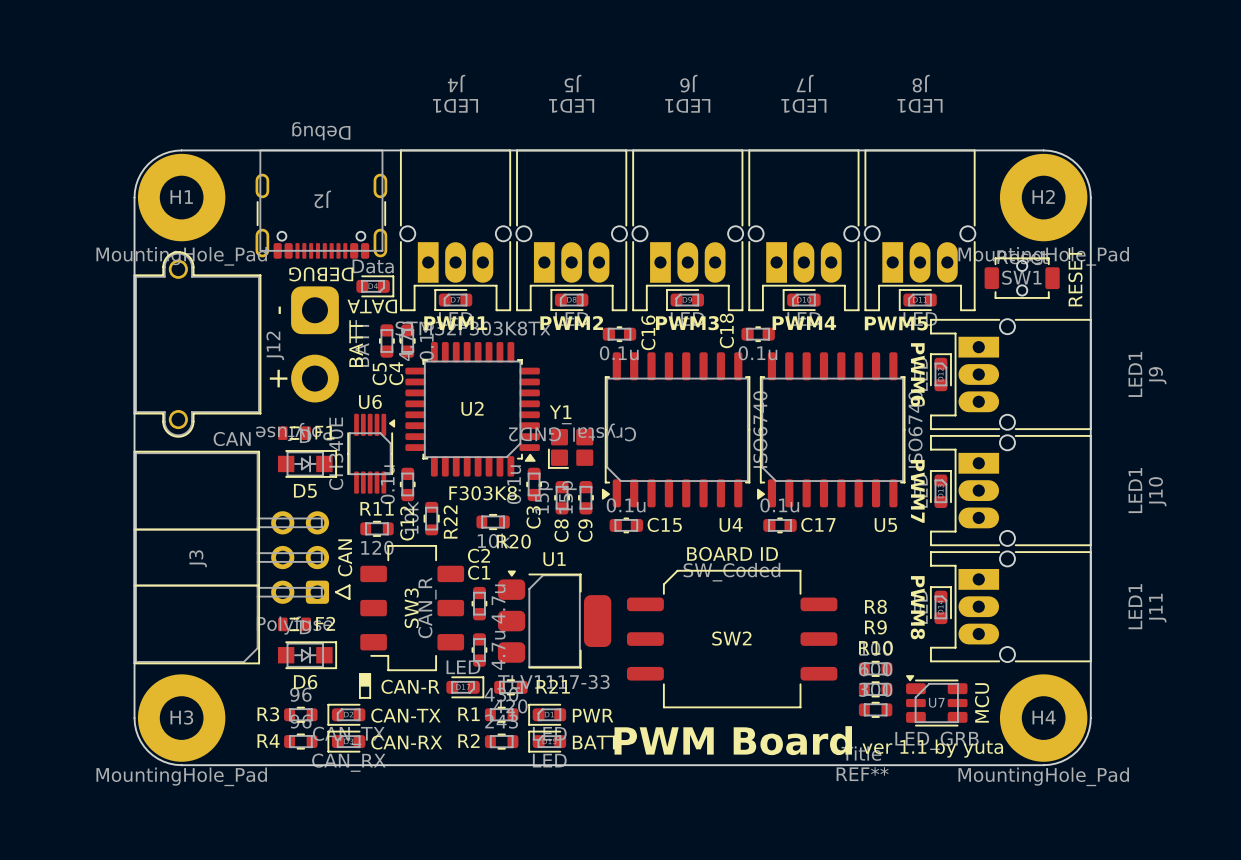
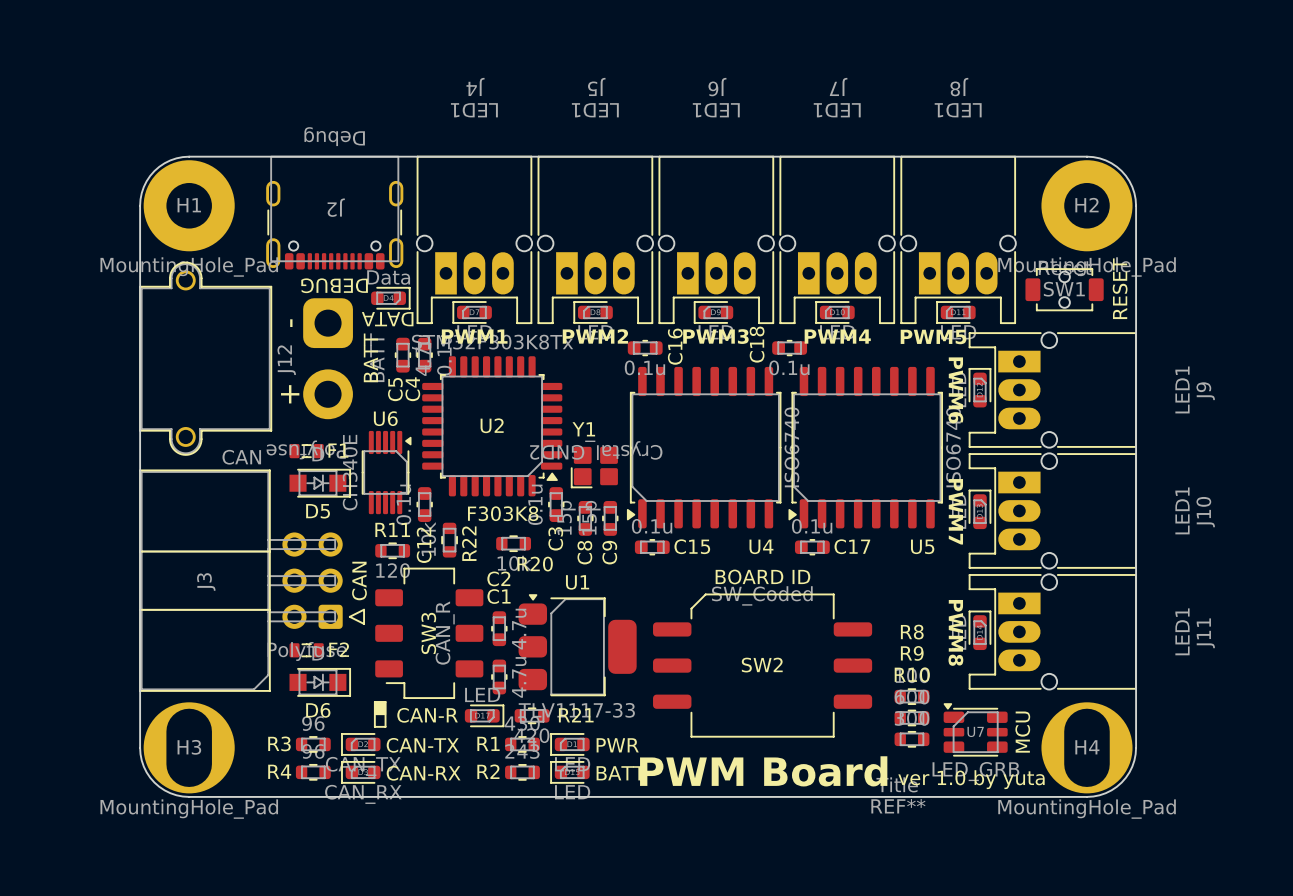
H3 footprint: [137, 674, 226, 762] -> [143, 702, 235, 794]
H4 footprint: [999, 674, 1088, 762] -> [1041, 702, 1133, 794]
REF** text: ver 1.1 by yuta (932, 748) -> ver 1.0 by yuta (971, 779)

